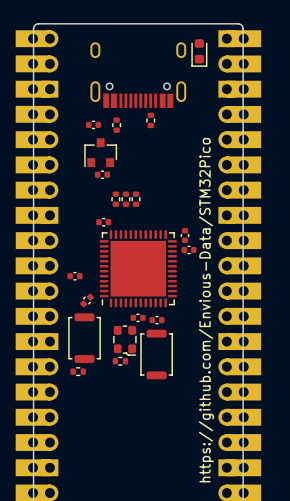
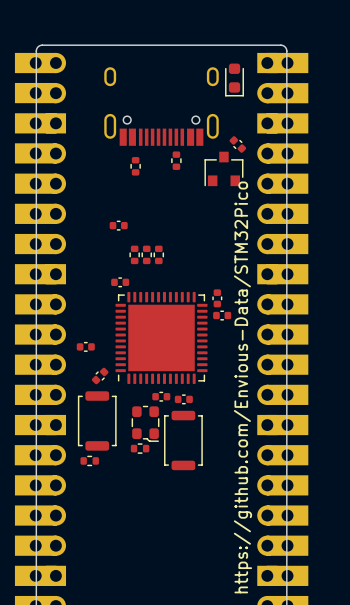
part: none -> (237, 144)
part: (93, 124) -> none
part position: (100, 152) -> (223, 168)

